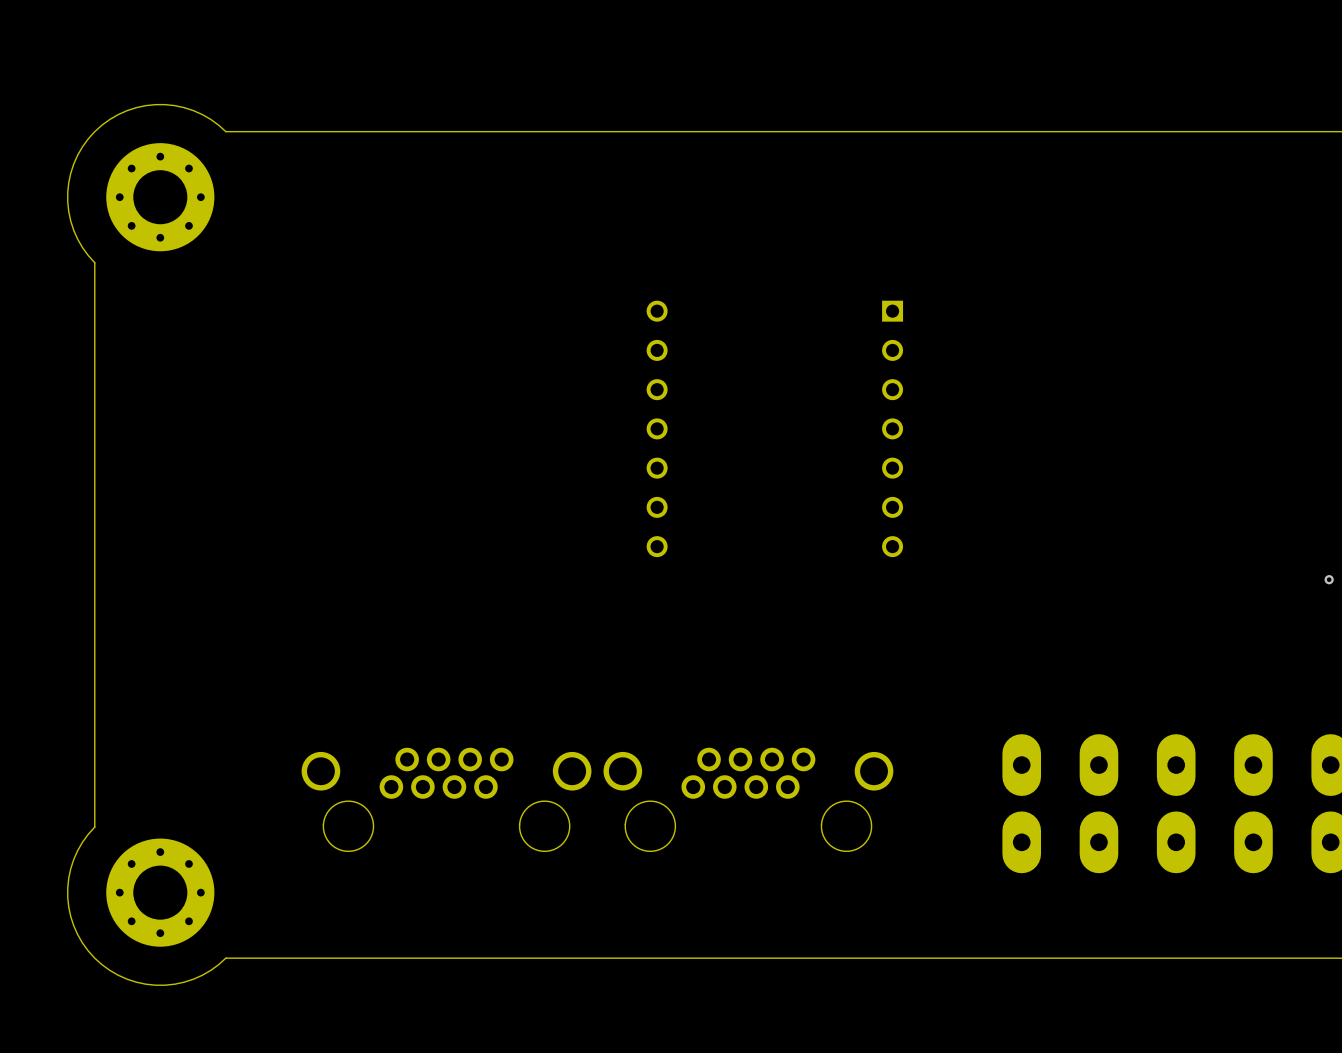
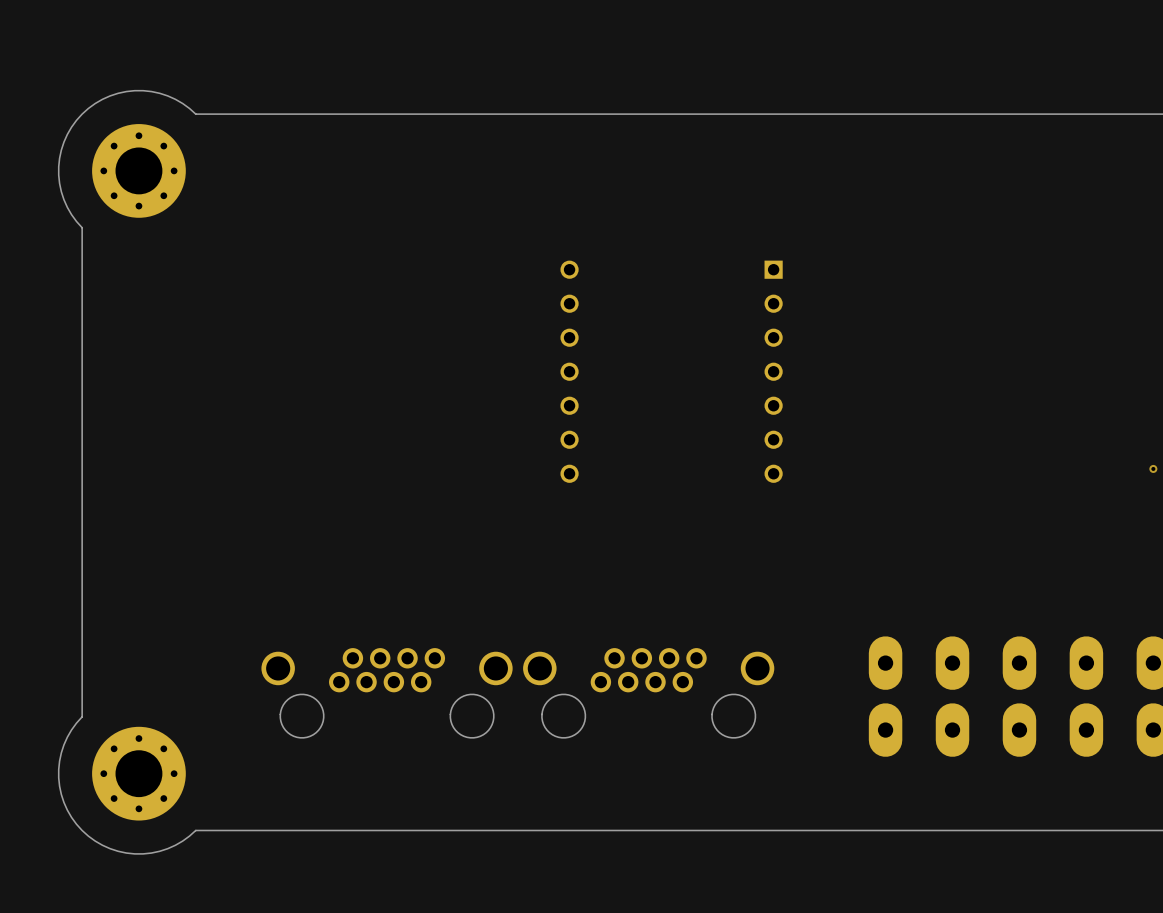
via position: (1329, 579) -> (1153, 468)

